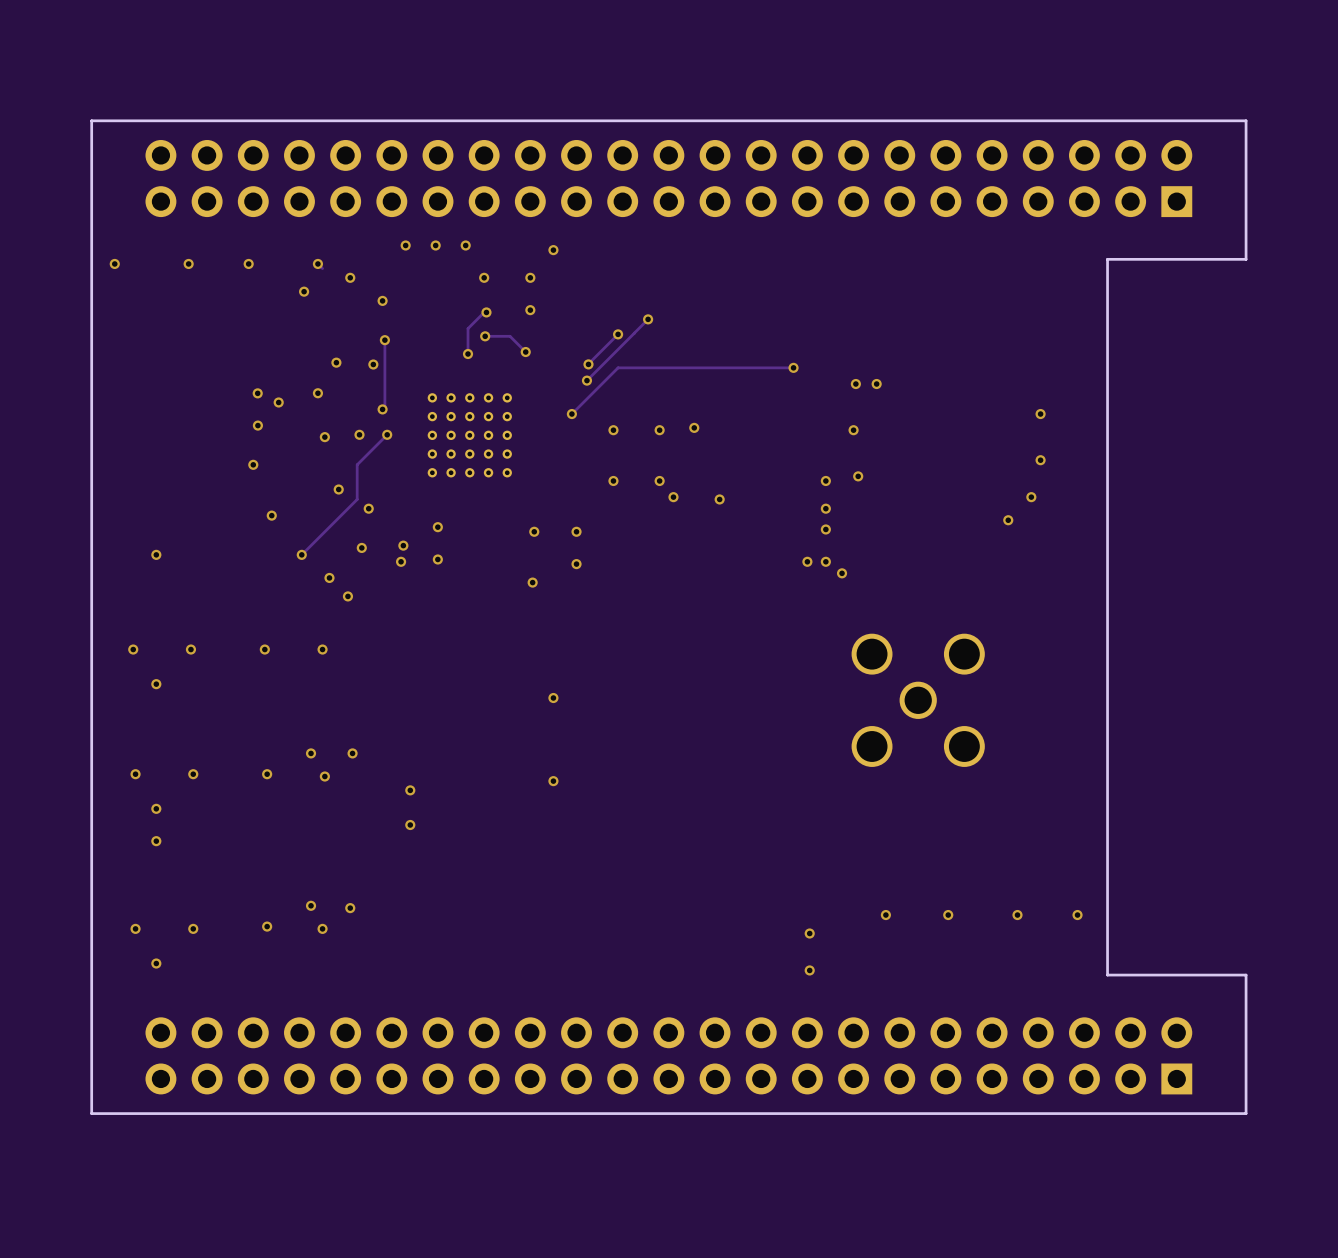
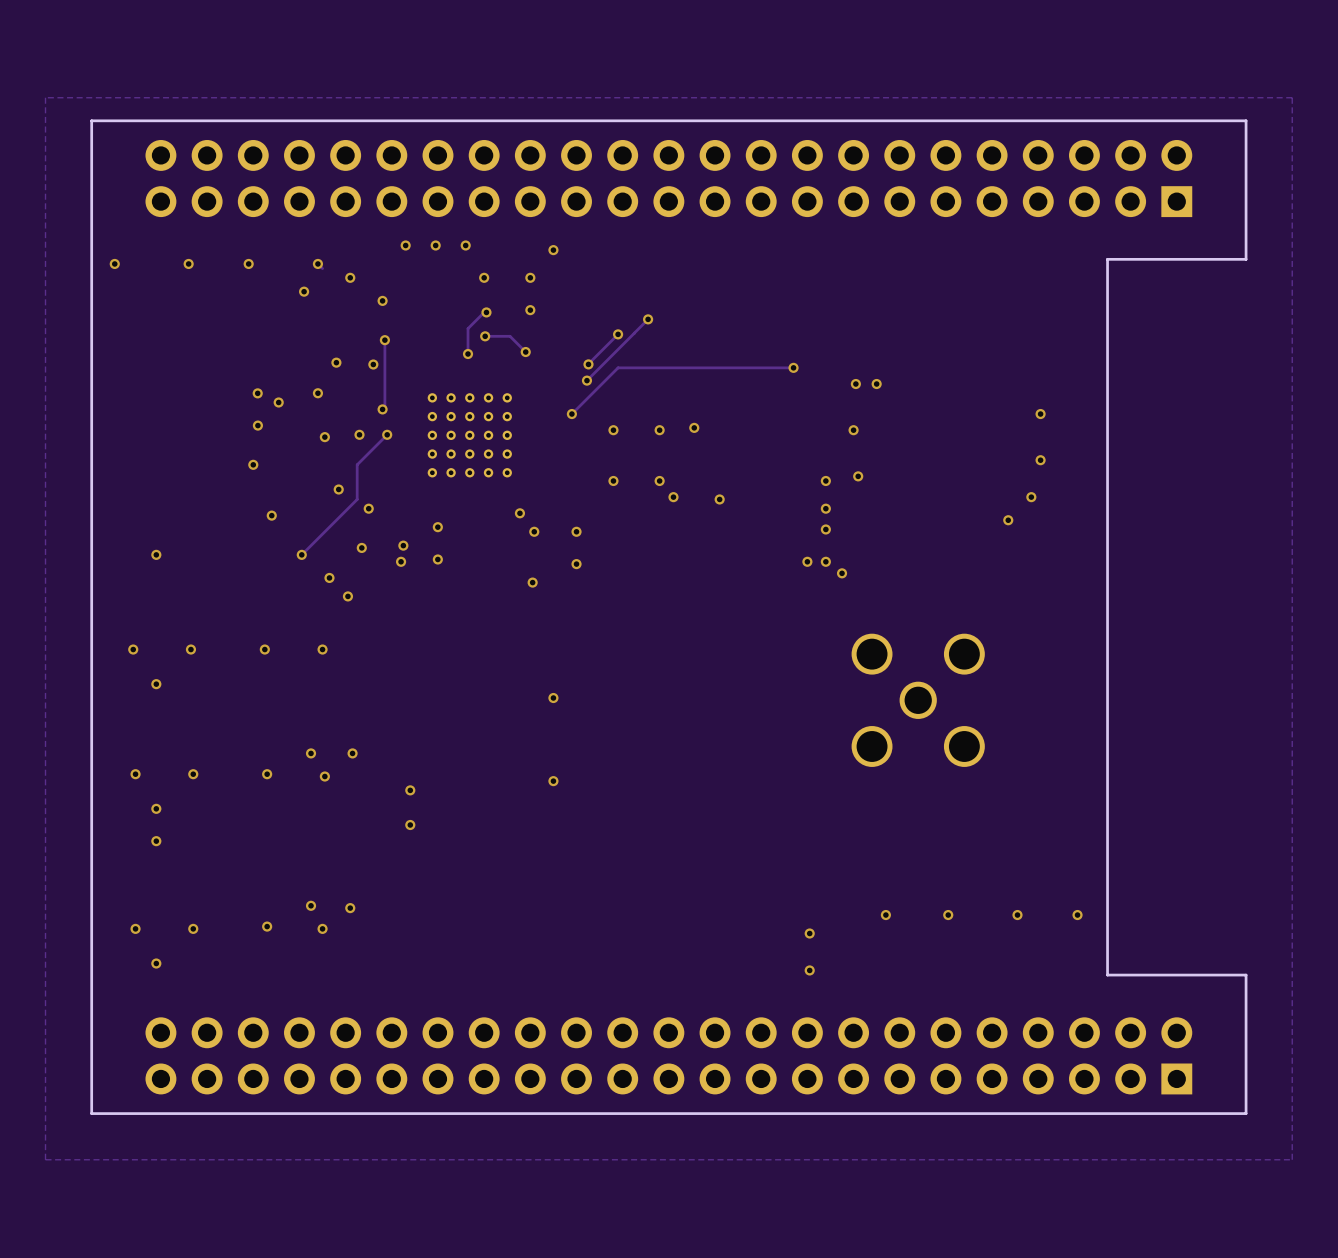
zone outline: none -> (1292, 97) (1292, 1159) (45, 1159) (45, 97) (1292, 97)
via: none -> (519, 513)

